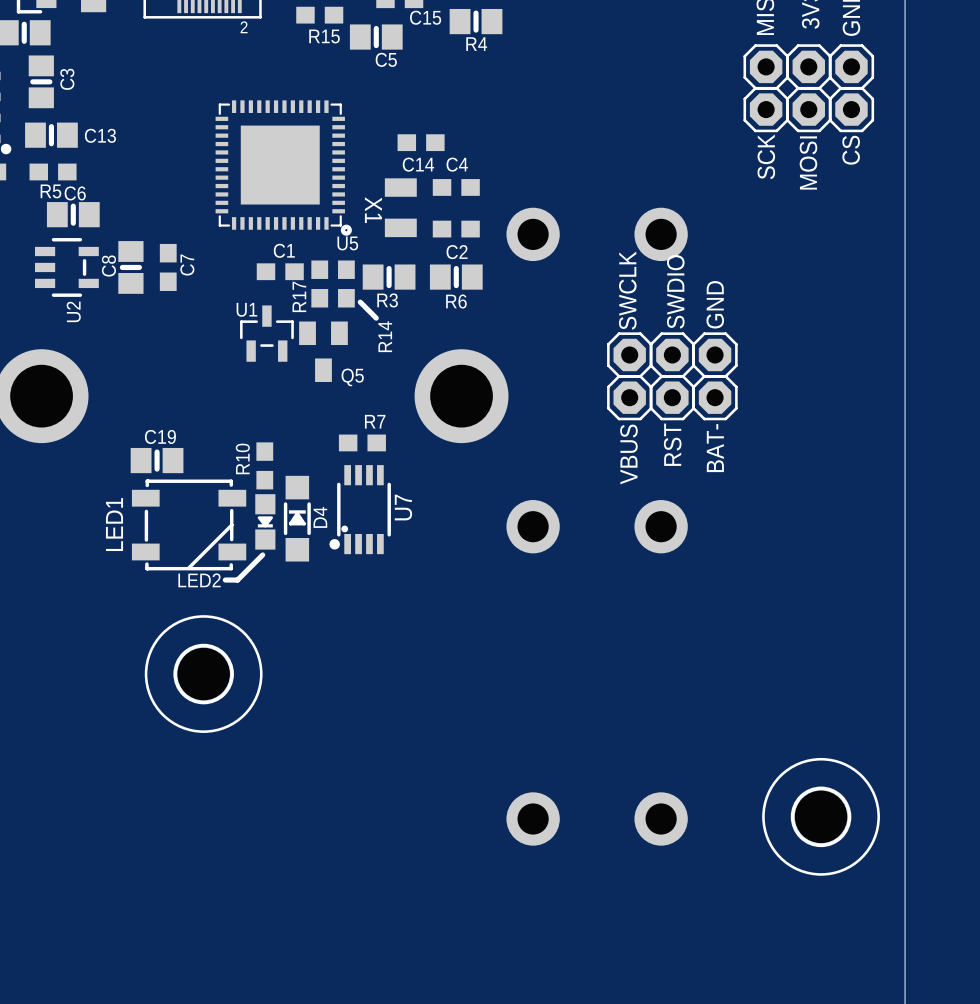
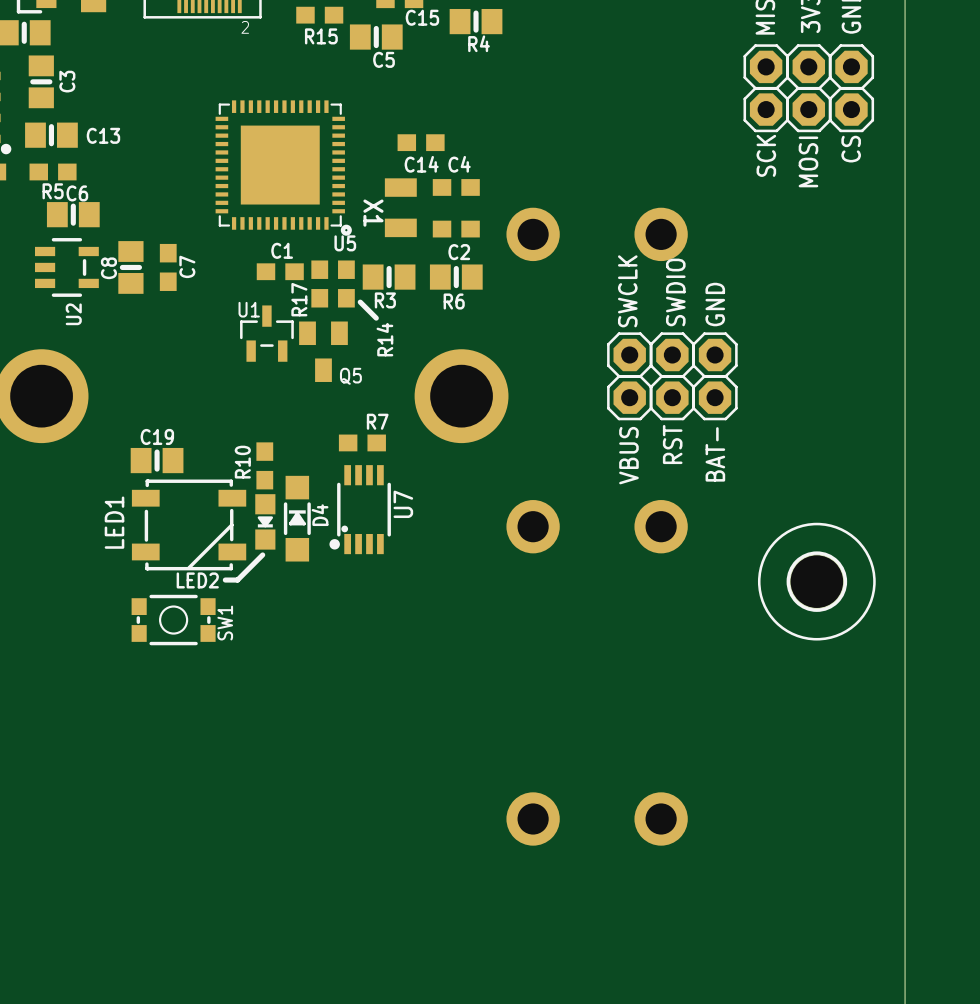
SW1: none -> (173, 620)
part: (203, 674) -> none
part position: (821, 816) -> (816, 581)

